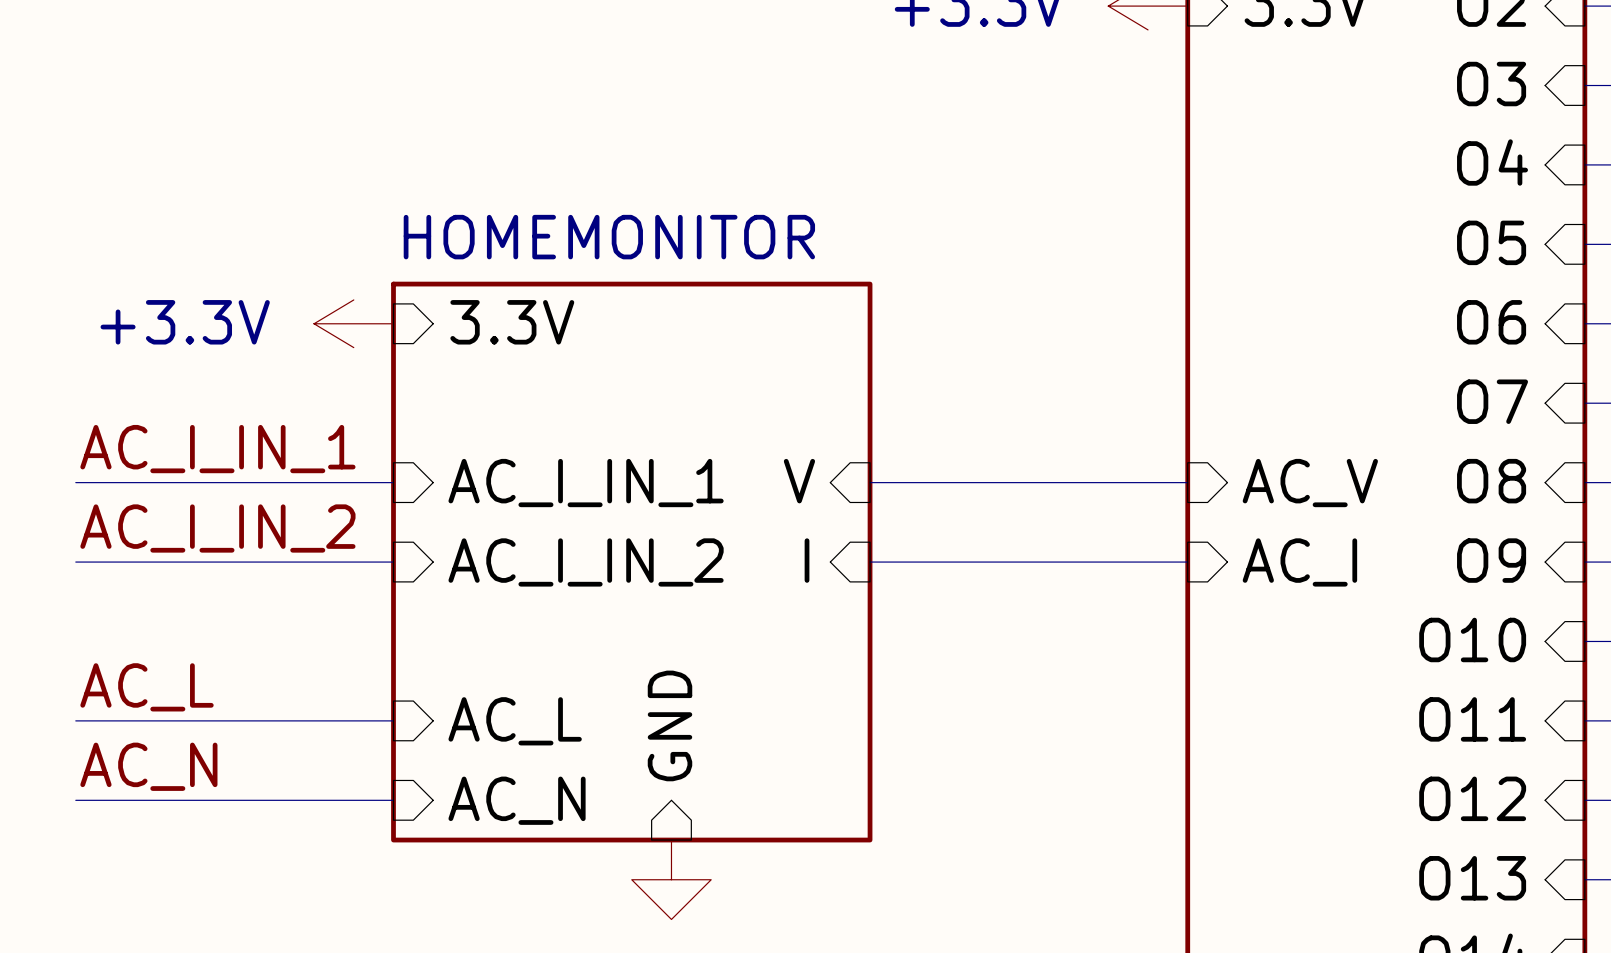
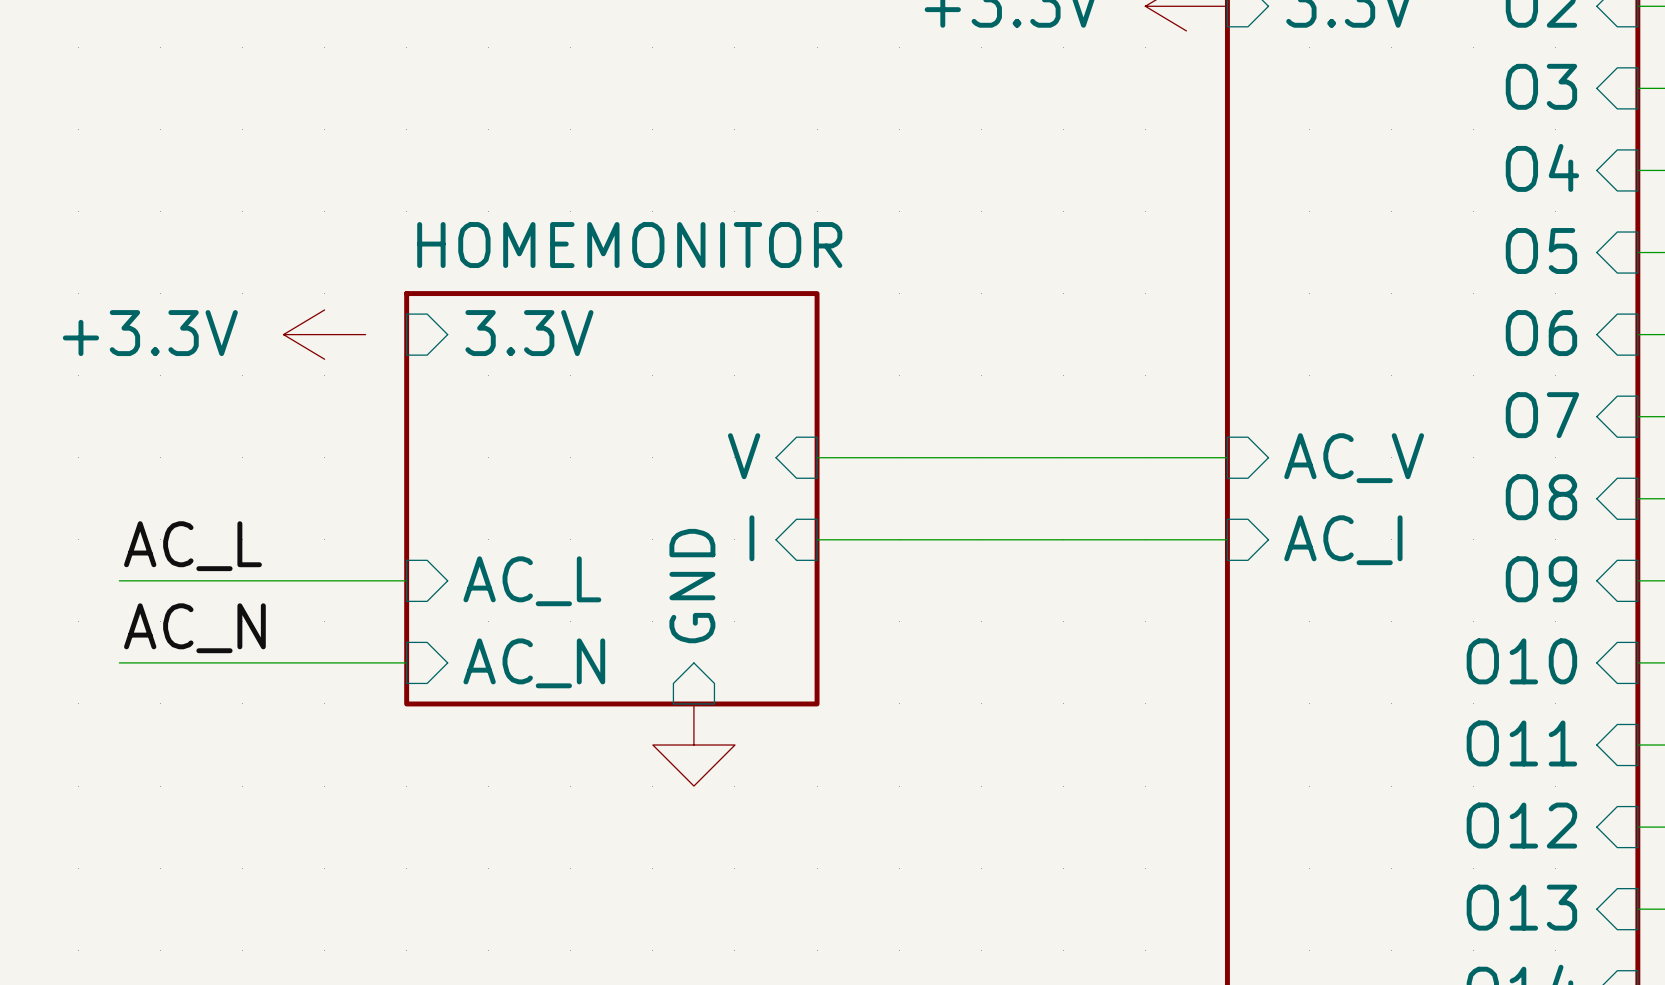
power symbol position: +3.3V (353, 323) -> +3.3V (324, 334)
wire: none -> (817, 457) (1227, 457)
label: AC_I_IN_1 (217, 449) -> none
sheet pin position: V (799, 481) -> V (744, 456)
wire: (75, 482) (393, 482) -> none
sheet HOMEMONITOR: none -> (611, 498)
wire: (870, 482) (1187, 482) -> none
sheet pin: AC_I_IN_1 (586, 483) -> none
sheet pin position: AC_V (1310, 483) -> AC_V (1354, 458)
wire: none -> (817, 539) (1227, 539)
label: AC_I_IN_2 (217, 528) -> none
sheet pin position: I (807, 560) -> I (751, 538)
wire: (75, 562) (115, 562) -> none
sheet pin: AC_I_IN_2 (586, 562) -> AC_L (532, 581)
sheet HOMEMONITOR: (631, 562) -> none
wire: (870, 562) (1187, 562) -> none
sheet pin position: AC_I (1299, 562) -> AC_I (1343, 540)
wire: none -> (119, 662) (406, 662)
label position: AC_L (147, 687) -> AC_L (192, 546)
wire: (75, 720) (393, 720) -> none
sheet pin: AC_L (515, 721) -> none
sheet pin position: GND (669, 725) -> GND (692, 586)
label position: AC_N (148, 766) -> AC_N (194, 628)
wire: (75, 800) (393, 800) -> none
sheet pin position: AC_N (517, 800) -> AC_N (534, 663)
power symbol position: (671, 879) -> (693, 745)

